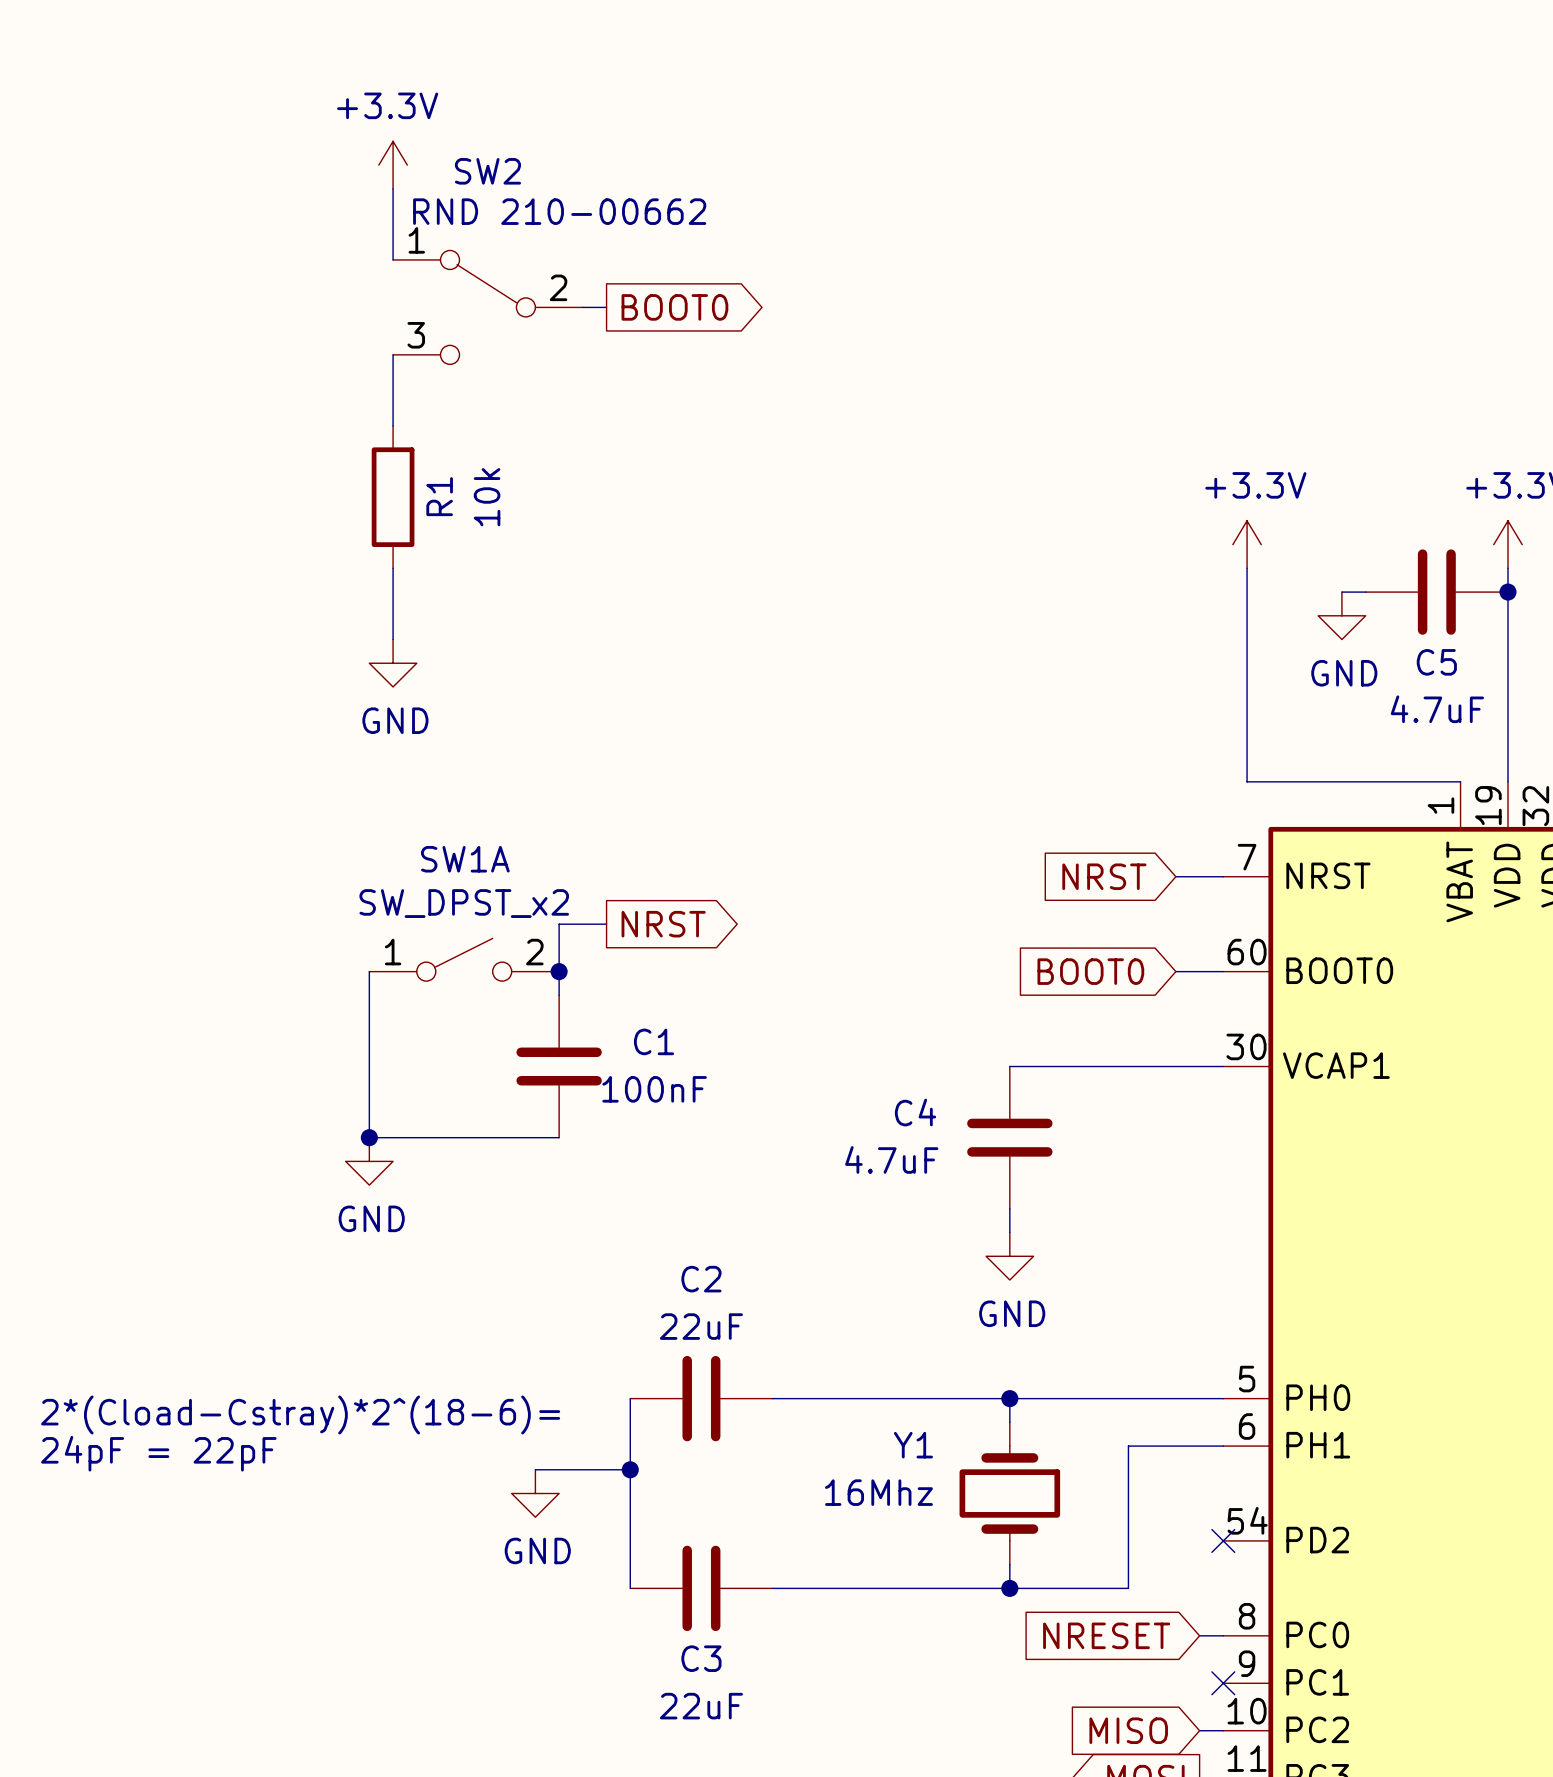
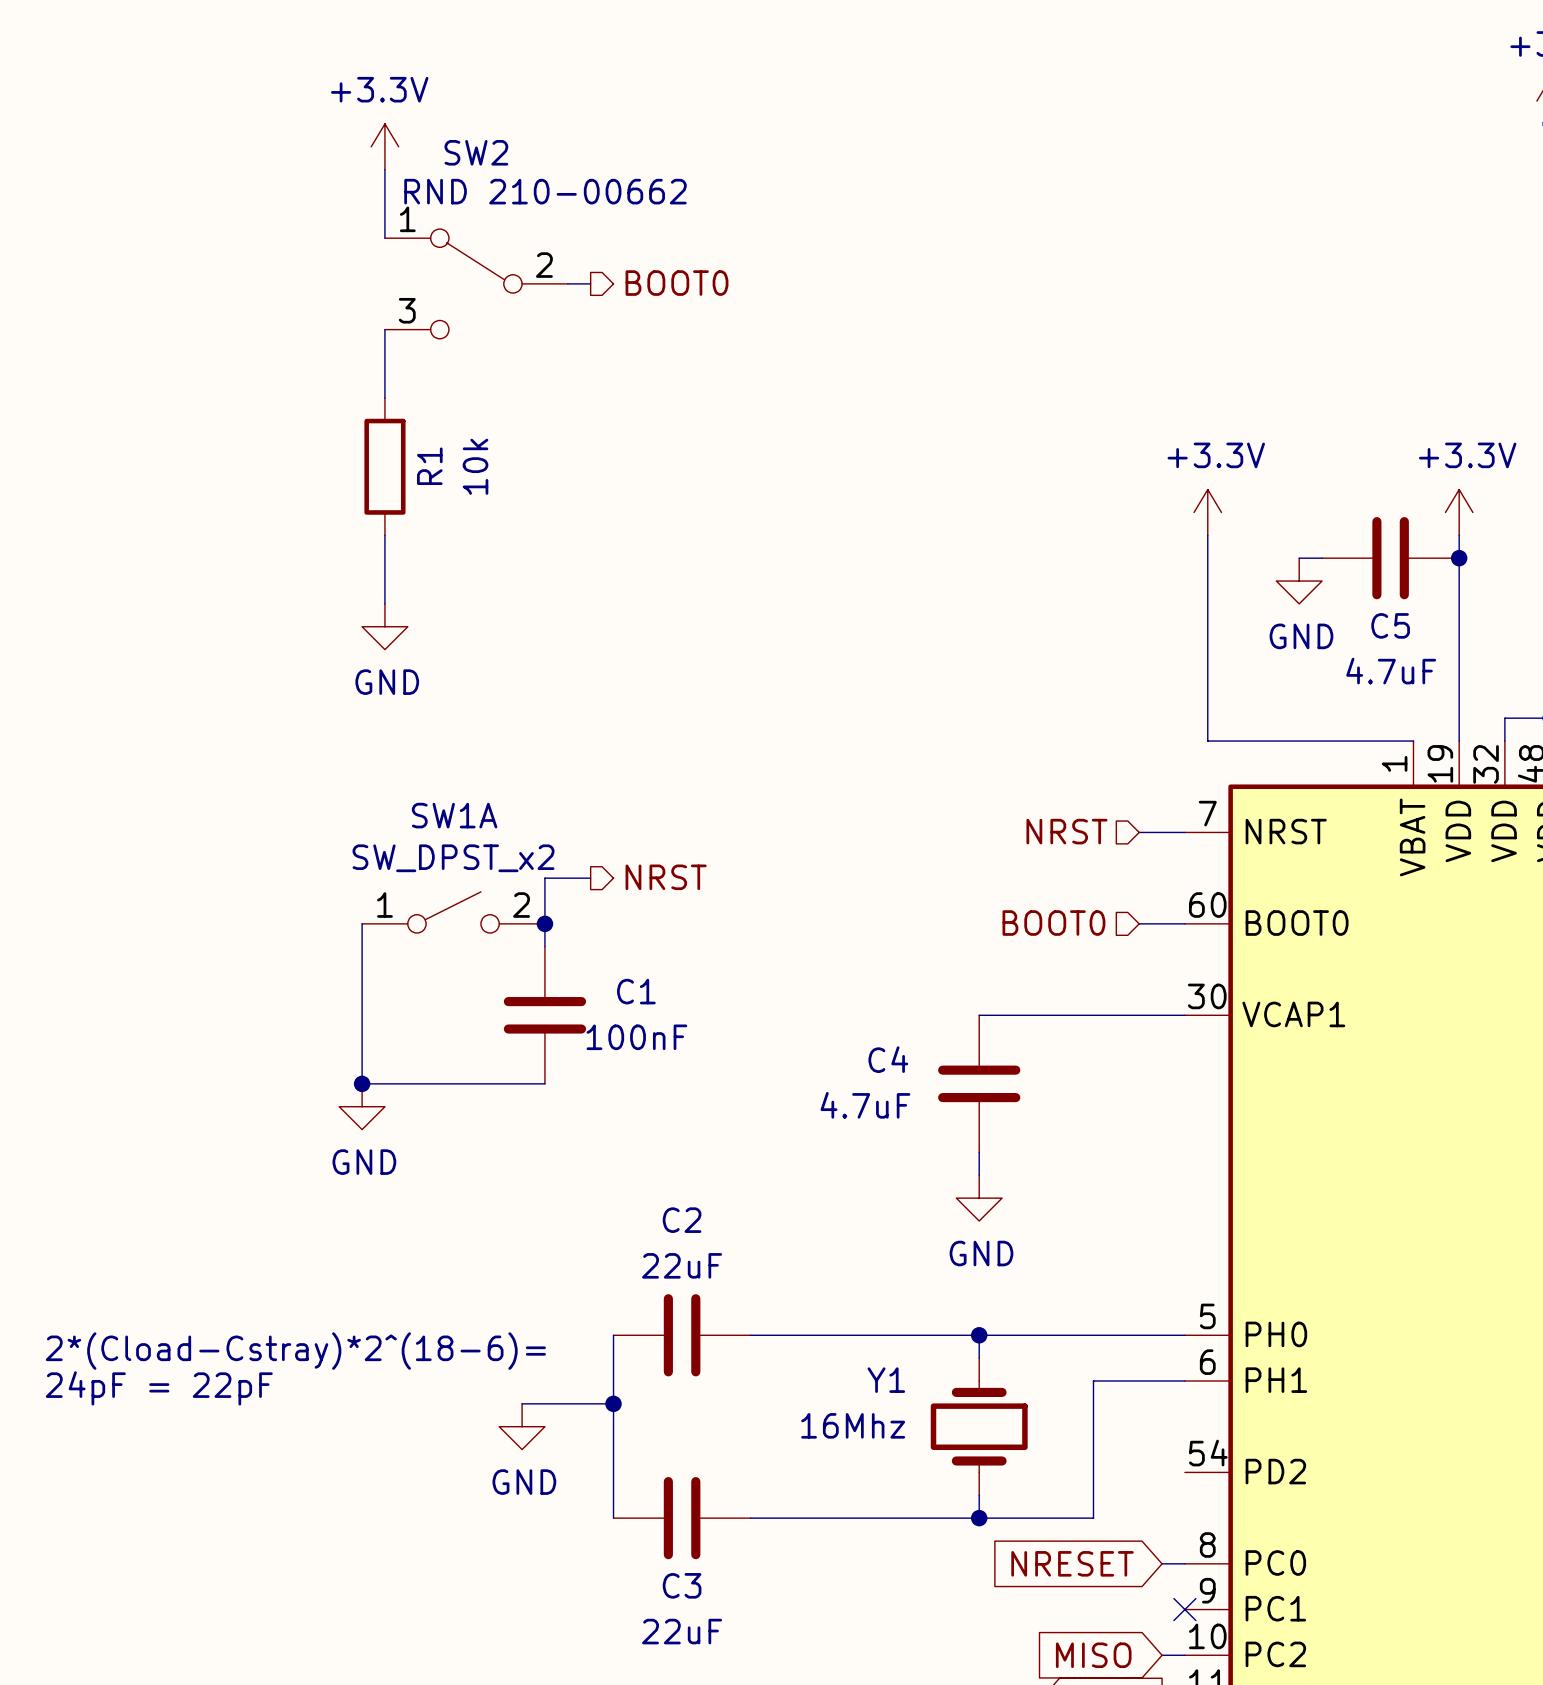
hierarchical label: none -> BOOT0 (677, 283)
global label: BOOT0 (674, 307) -> none
hierarchical label: none -> NRST (1067, 831)
global label: NRST (1104, 876) -> none
hierarchical label: none -> NRST (666, 877)
global label: NRST (663, 924) -> none
hierarchical label: none -> BOOT0 (1053, 923)
global label: BOOT0 (1090, 971) -> none
no-connect mark: (1223, 1540) -> none

